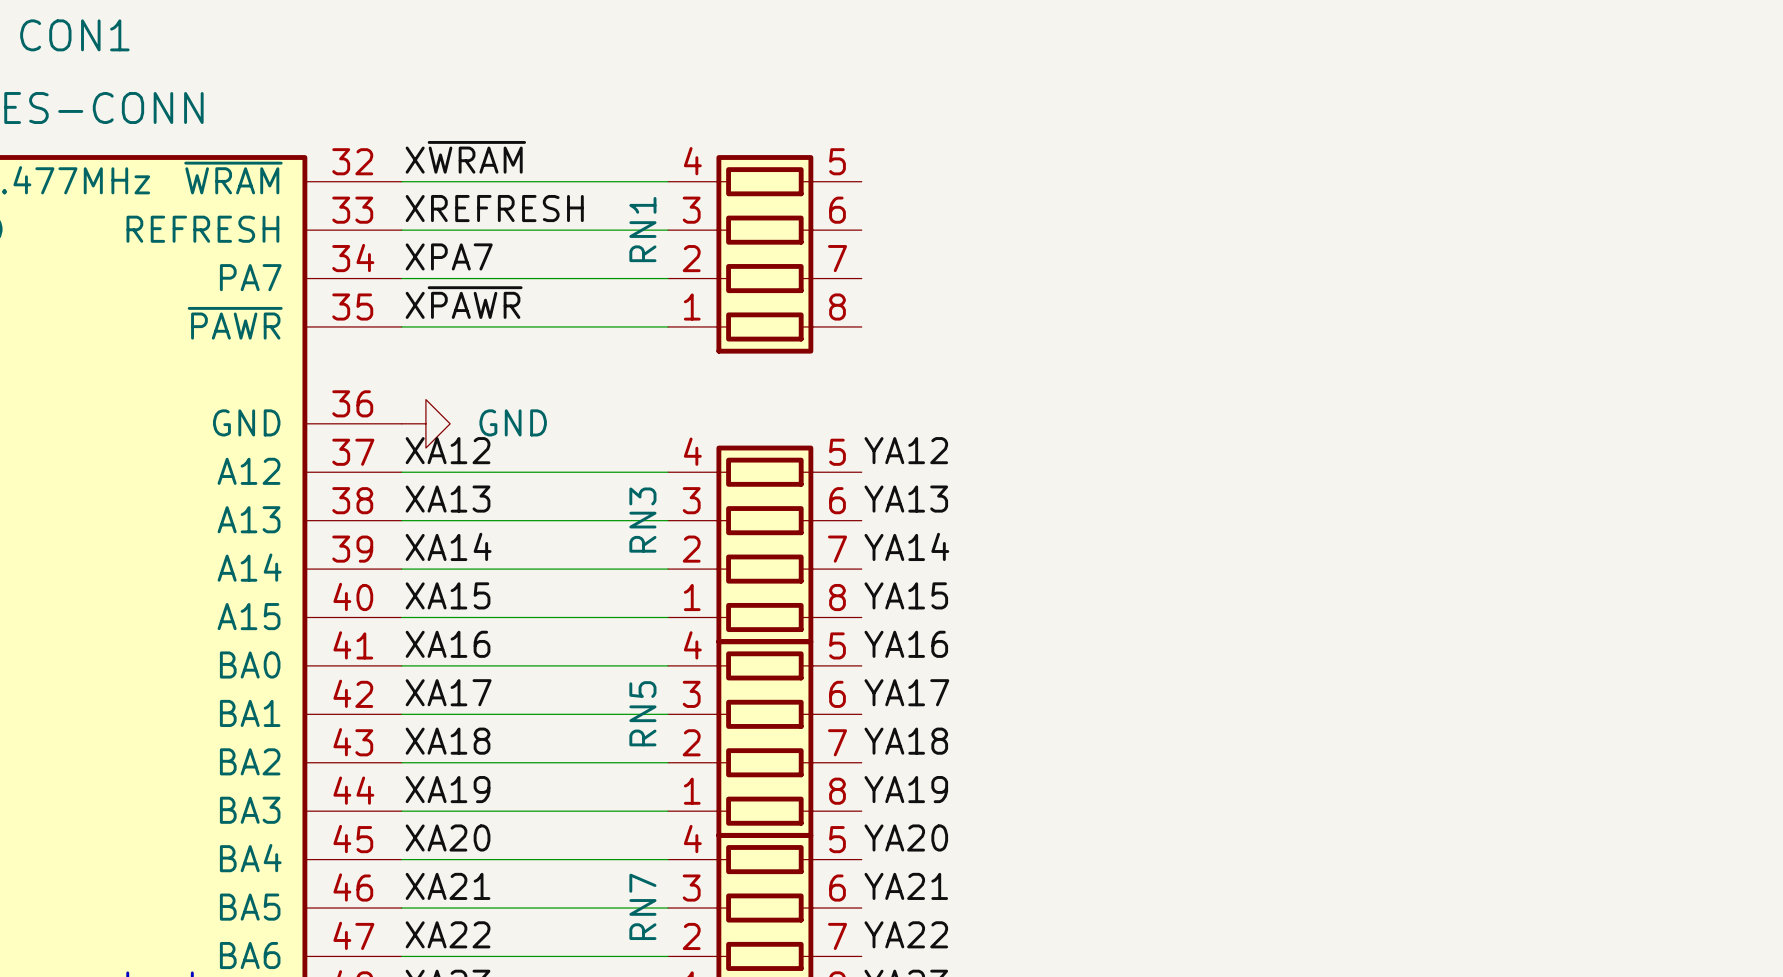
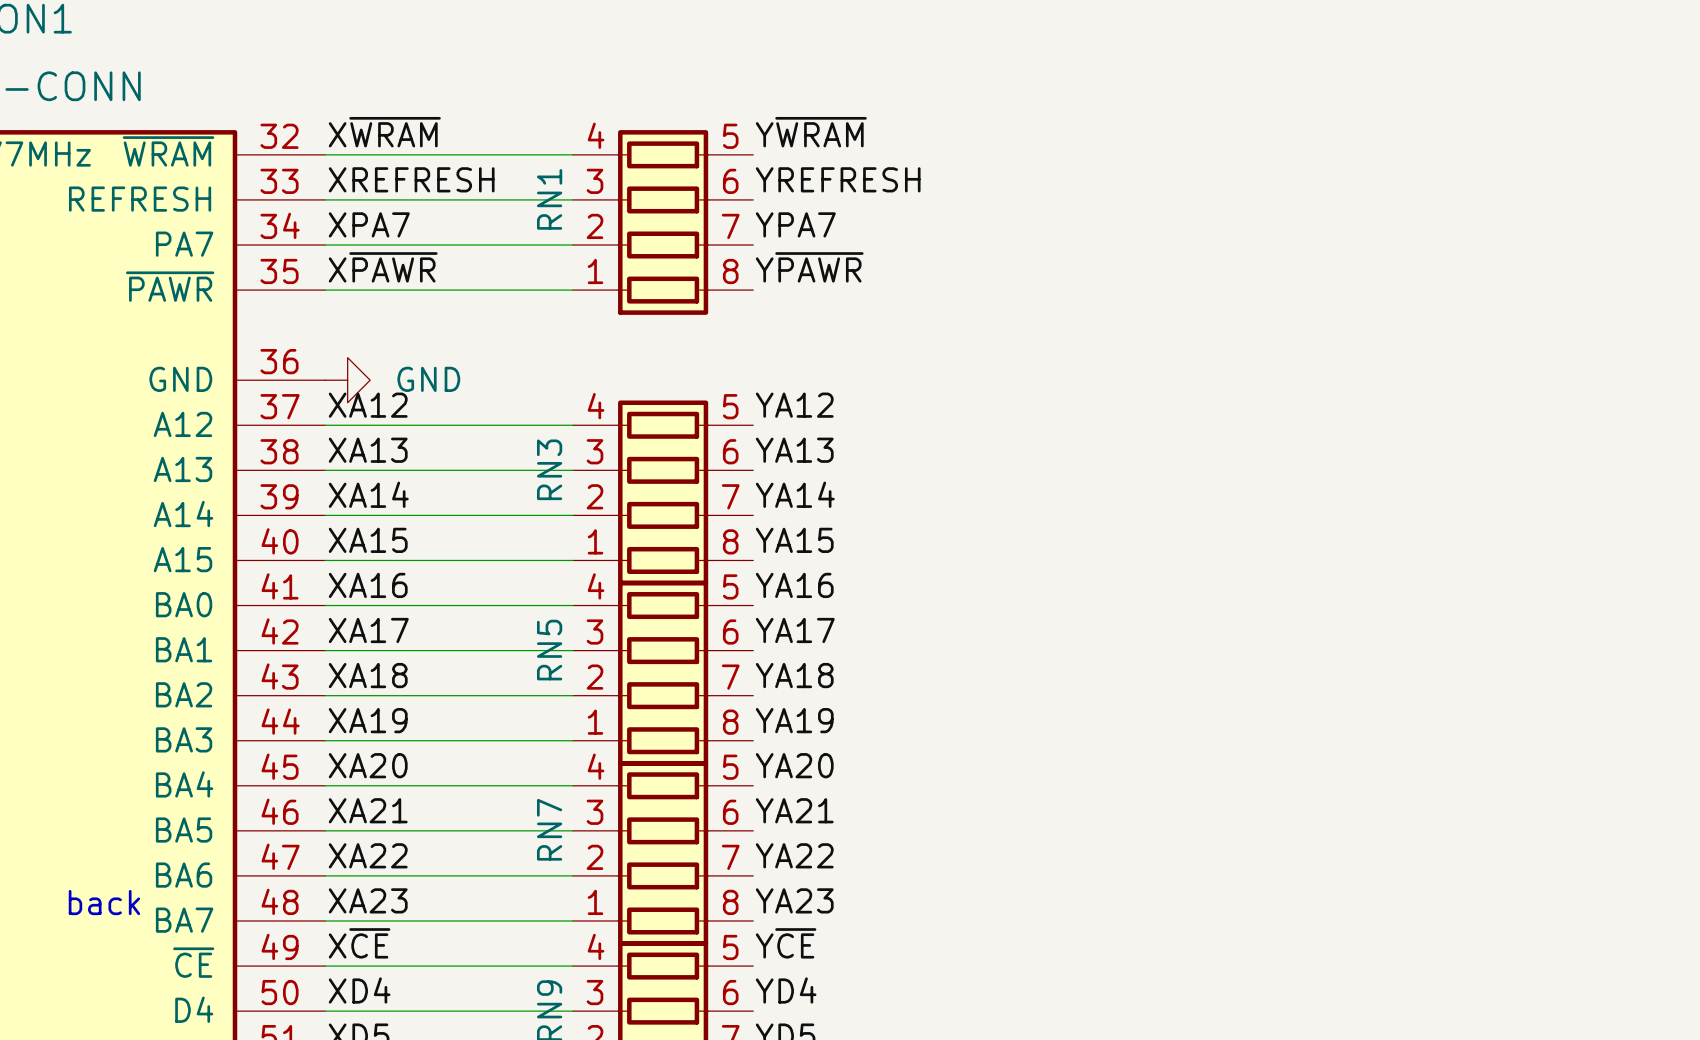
label: none -> Y~{WRAM} (811, 132)
label: none -> YREFRESH (838, 179)
label: none -> YPA7 (795, 224)
label: none -> Y~{PAWR} (809, 267)

